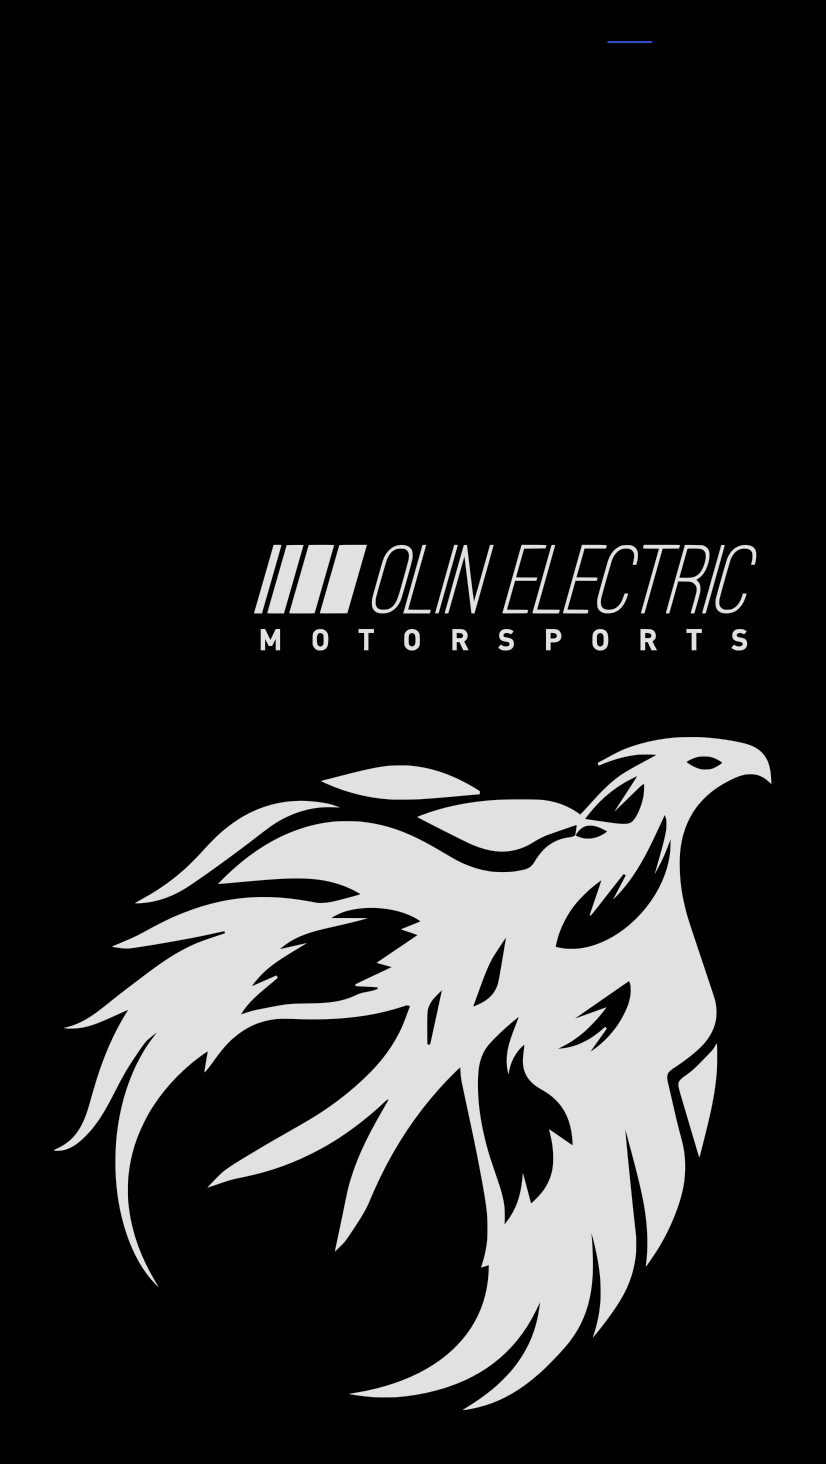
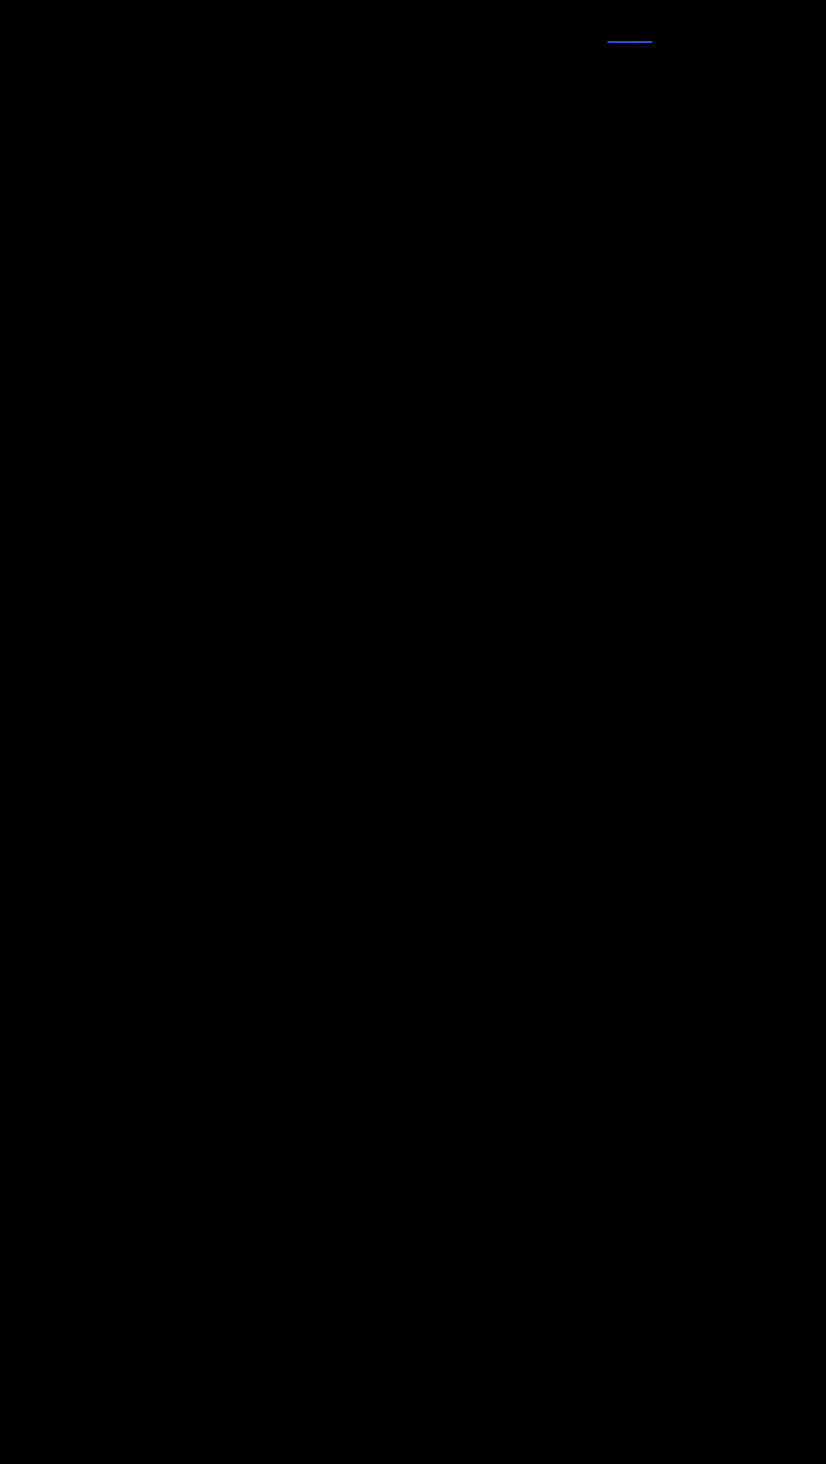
drawing: [253, 544, 757, 651] -> none
drawing: [54, 737, 772, 1411] -> none

